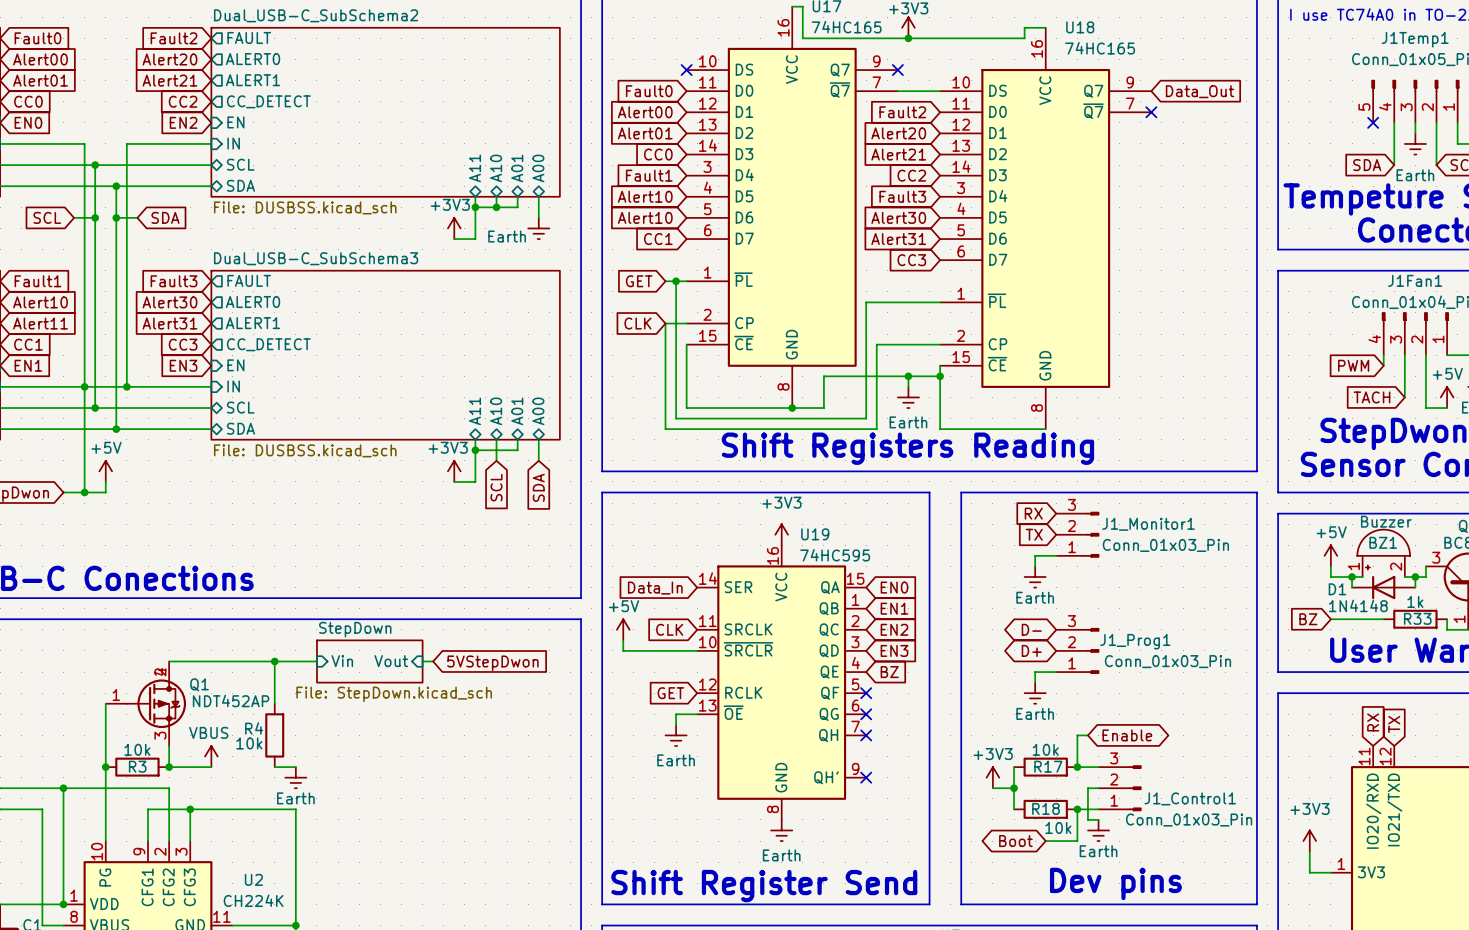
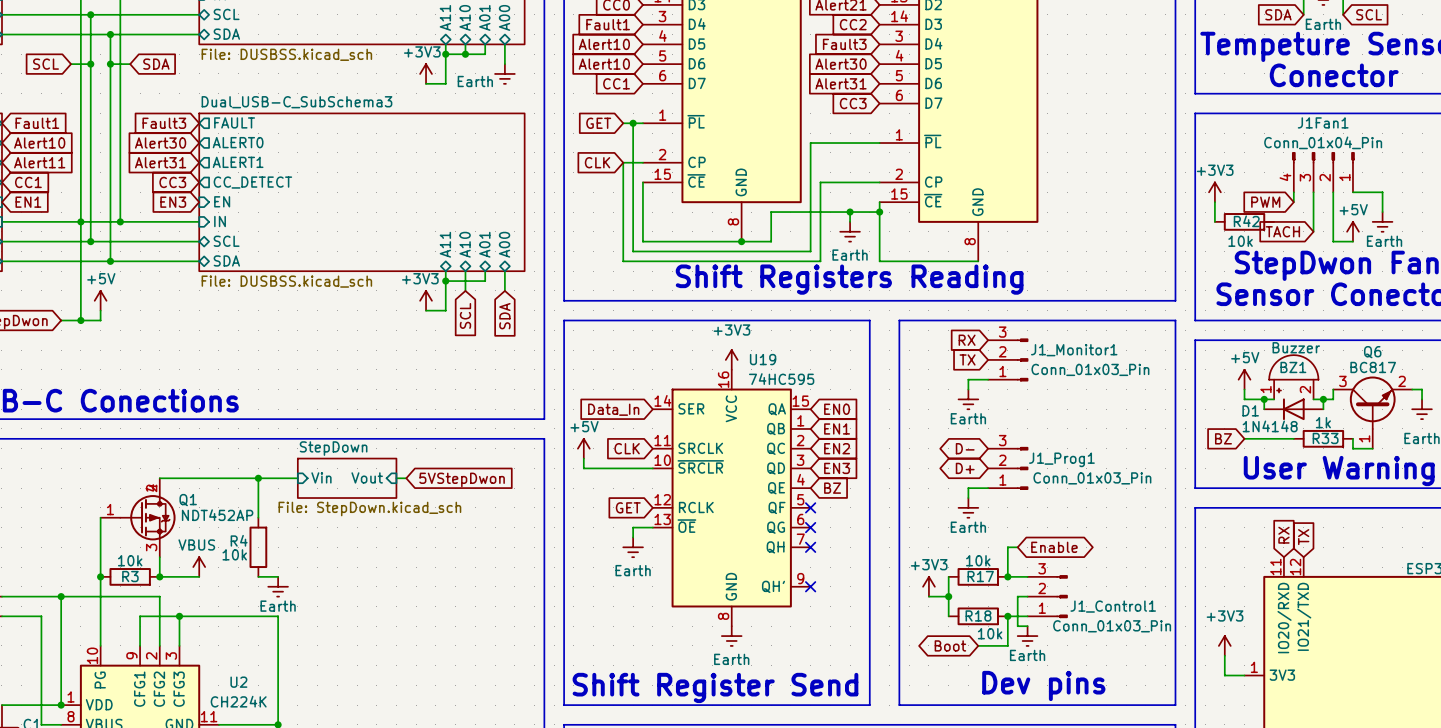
power symbol: none -> +3V3 (1214, 192)
wire: none -> (1214, 202) (1214, 221)
R42: none -> 10k (1244, 221)

